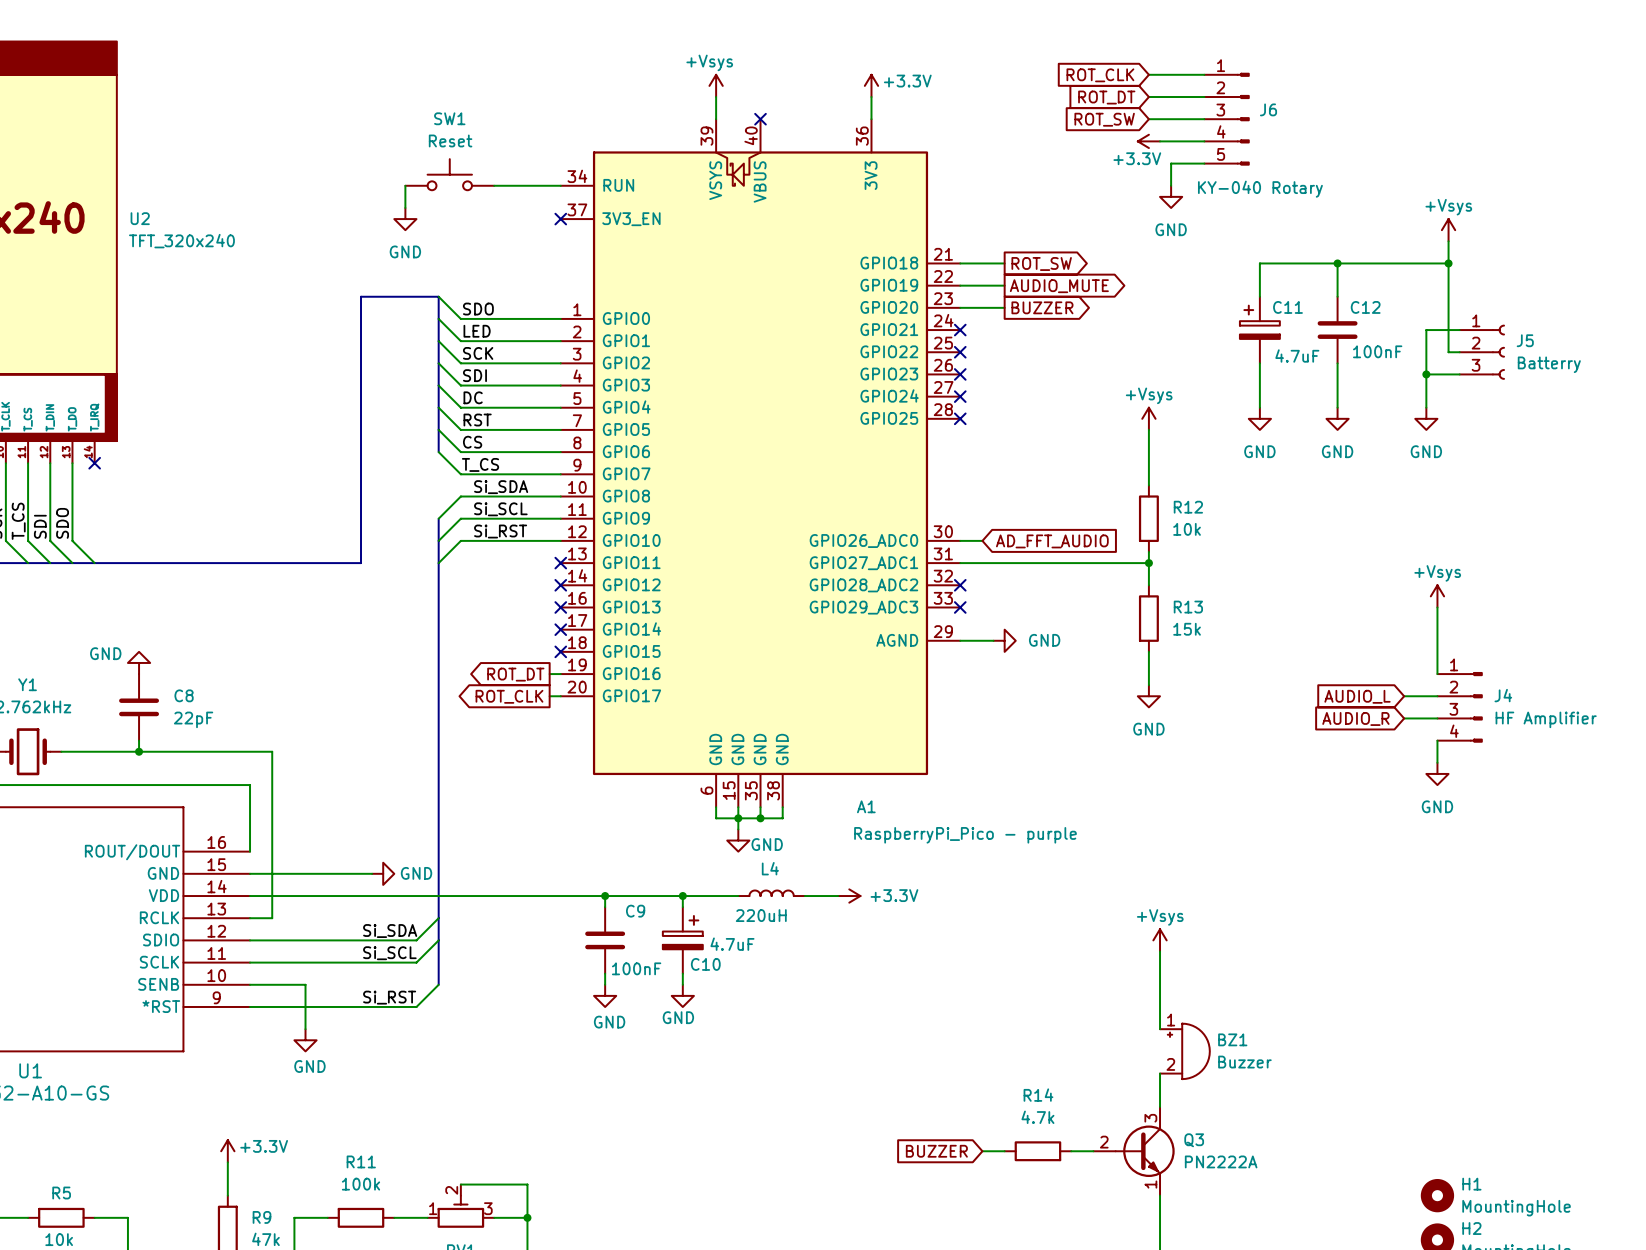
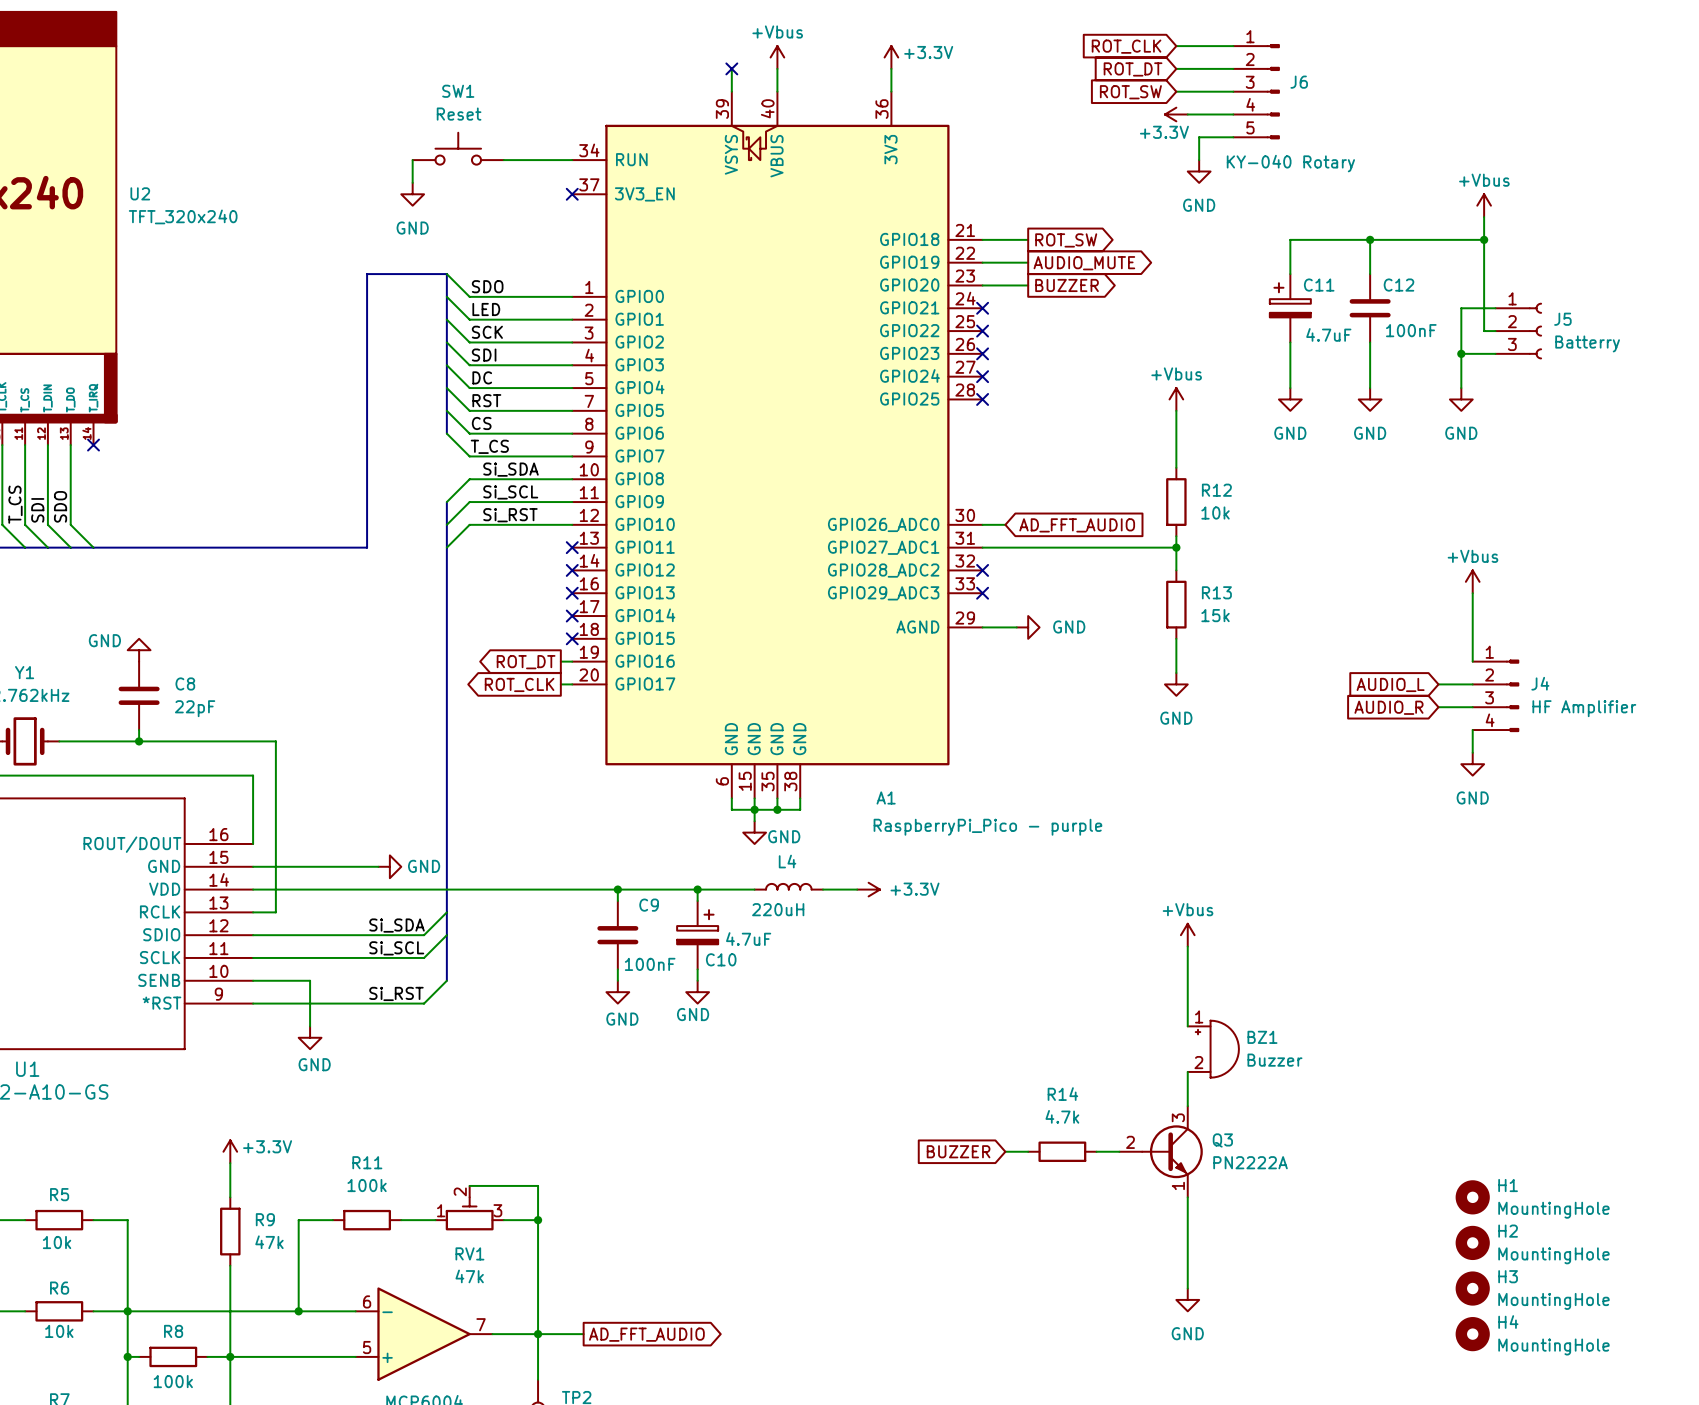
power symbol: +Vsys (716, 85) -> none
power symbol: none -> +Vbus (777, 57)
wire: none -> (777, 68) (777, 91)
no-connect mark position: (760, 119) -> (731, 68)
power symbol: +Vsys (1448, 230) -> +Vbus (1484, 205)
power symbol: +Vsys (1148, 418) -> +Vbus (1176, 399)
power symbol: +Vsys (1437, 596) -> +Vbus (1472, 581)
power symbol: +Vsys (1160, 940) -> +Vbus (1187, 935)

